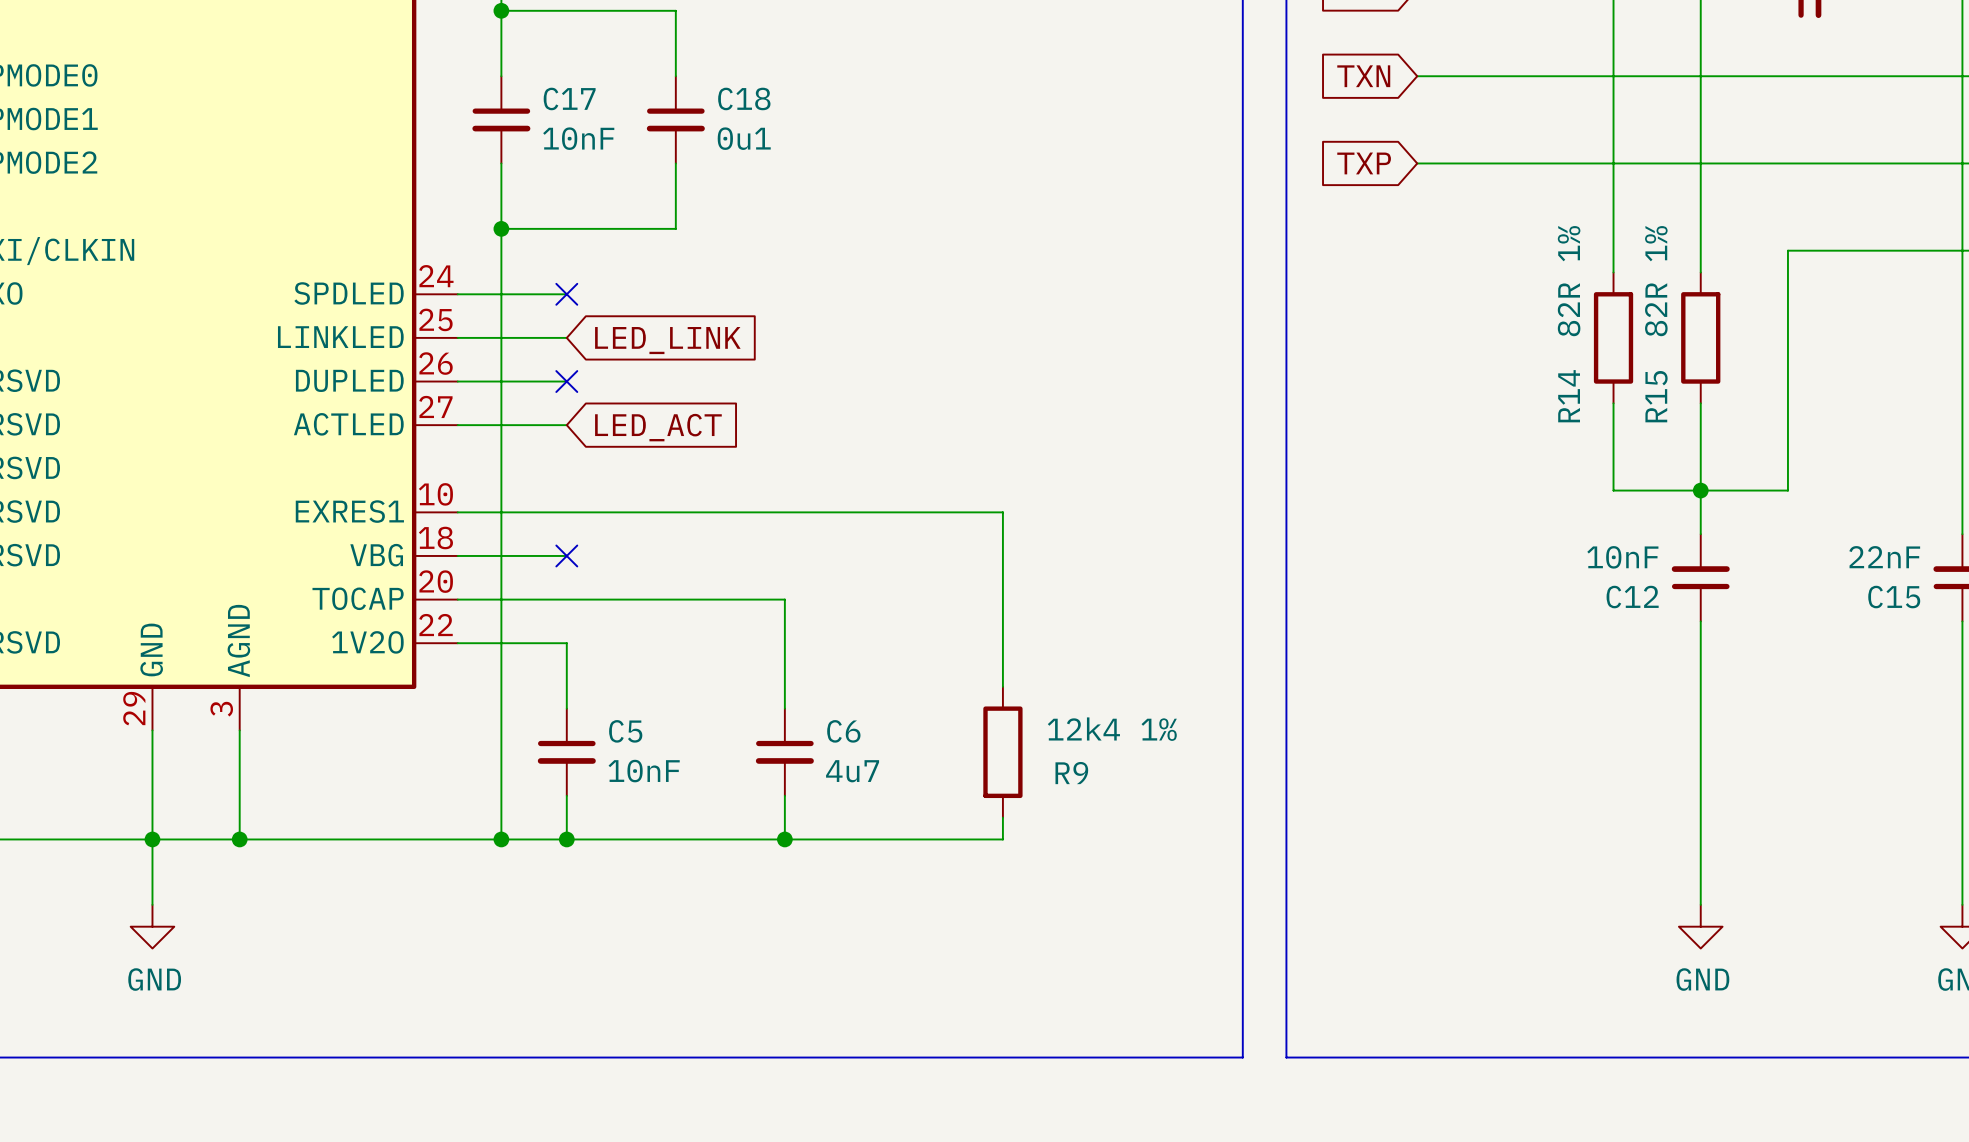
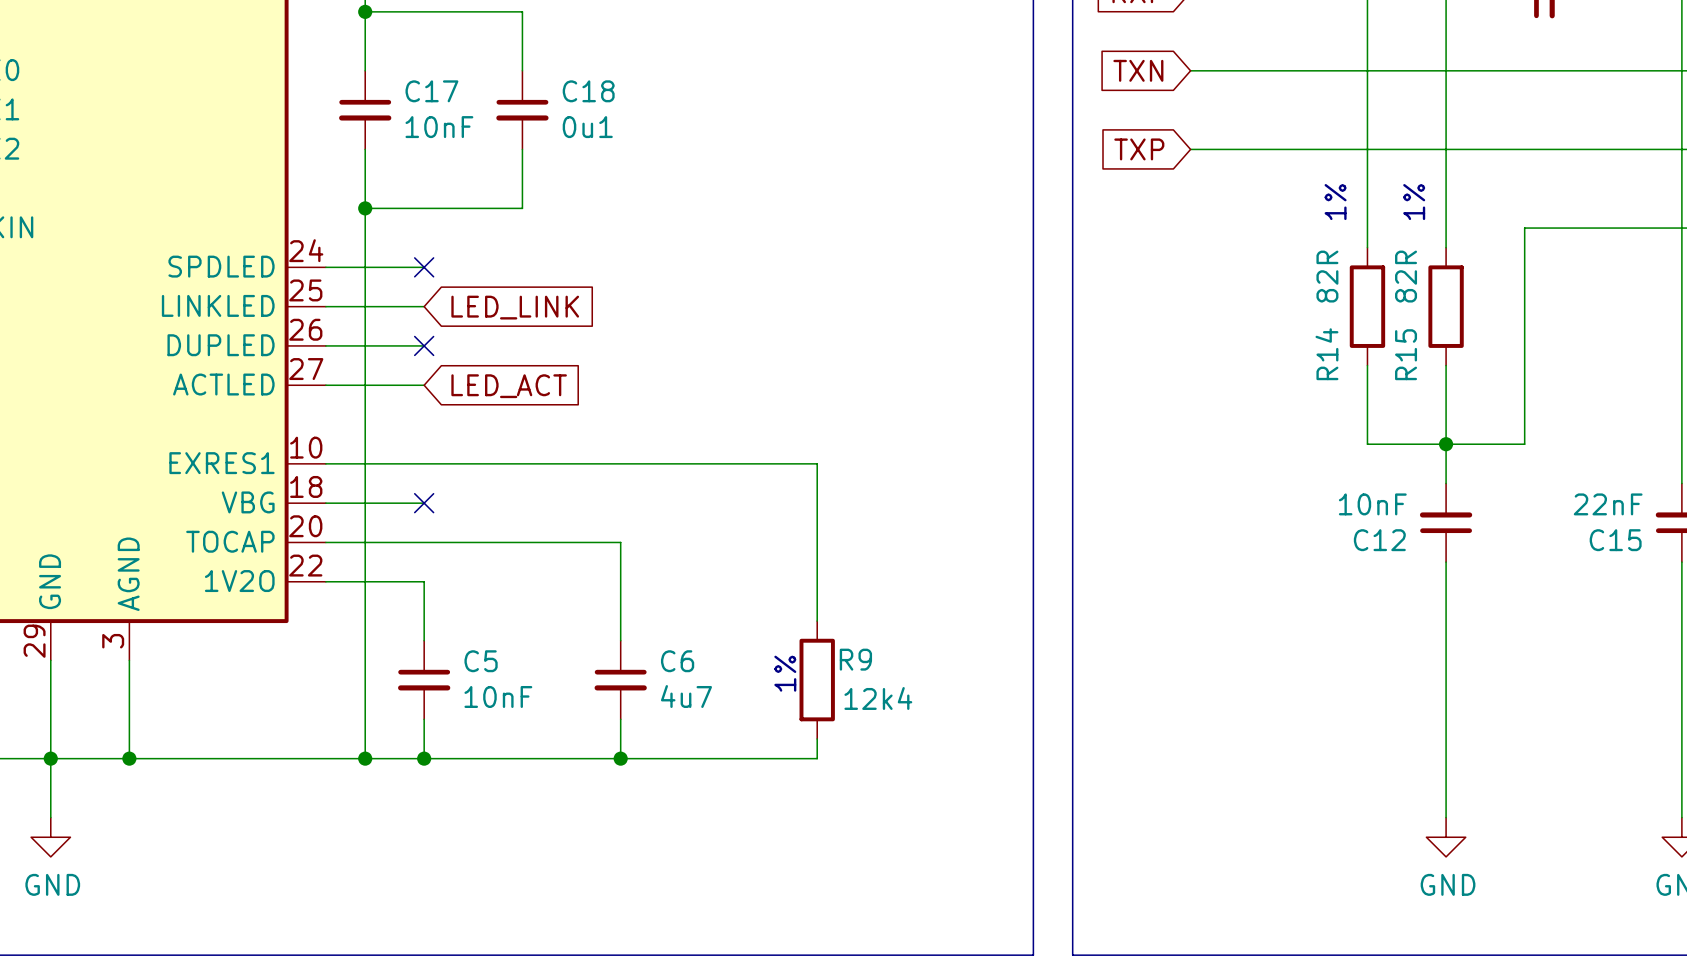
text: none -> 1% (1335, 202)
text: none -> 1% (1414, 202)
R14 value: 82R 1% (1569, 281) -> 82R (1327, 276)
R15 value: 82R 1% (1656, 281) -> 82R (1406, 276)
R9 value: 12k4 1% (1112, 729) -> 12k4 (878, 698)
text: none -> 1% (785, 673)
R9 name position: R9 (1071, 773) -> R9 (855, 659)

